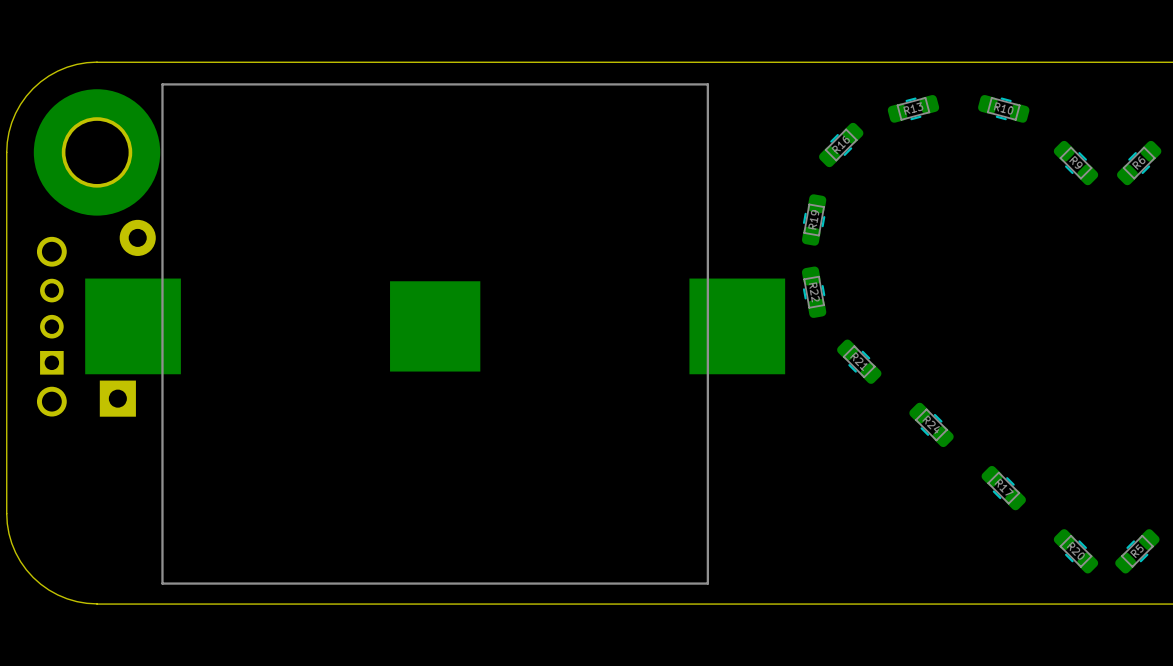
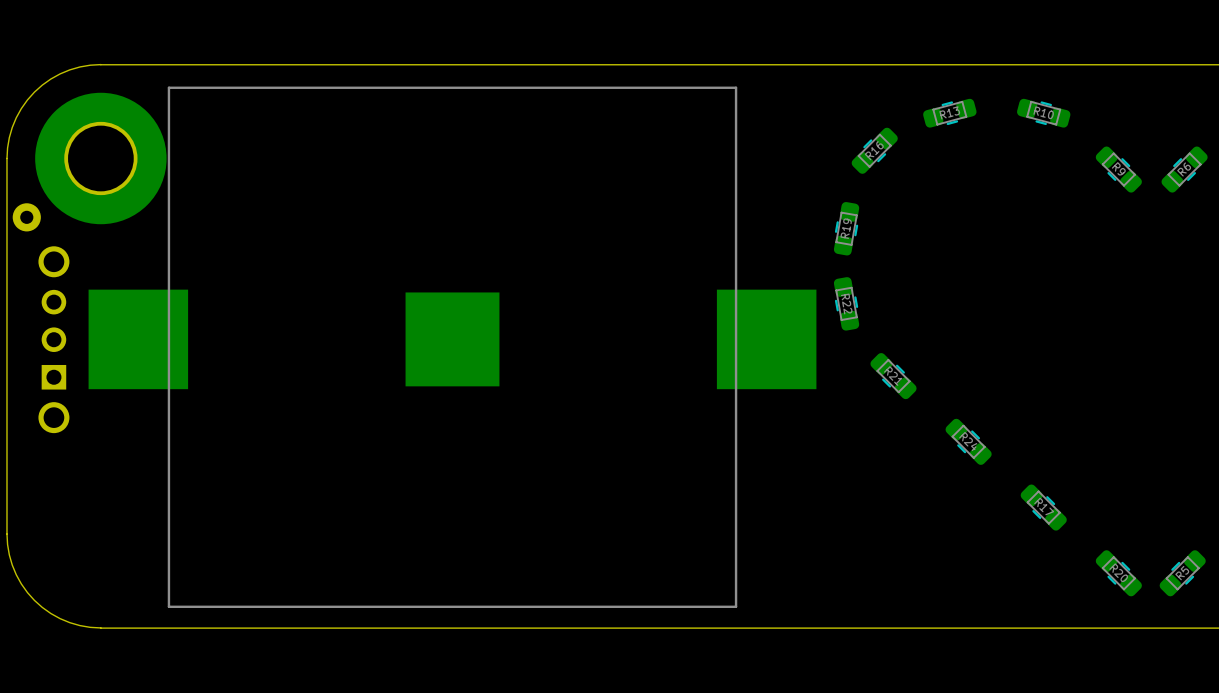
part: none -> (26, 217)
part: (137, 237) -> none
part: (117, 398) -> none

